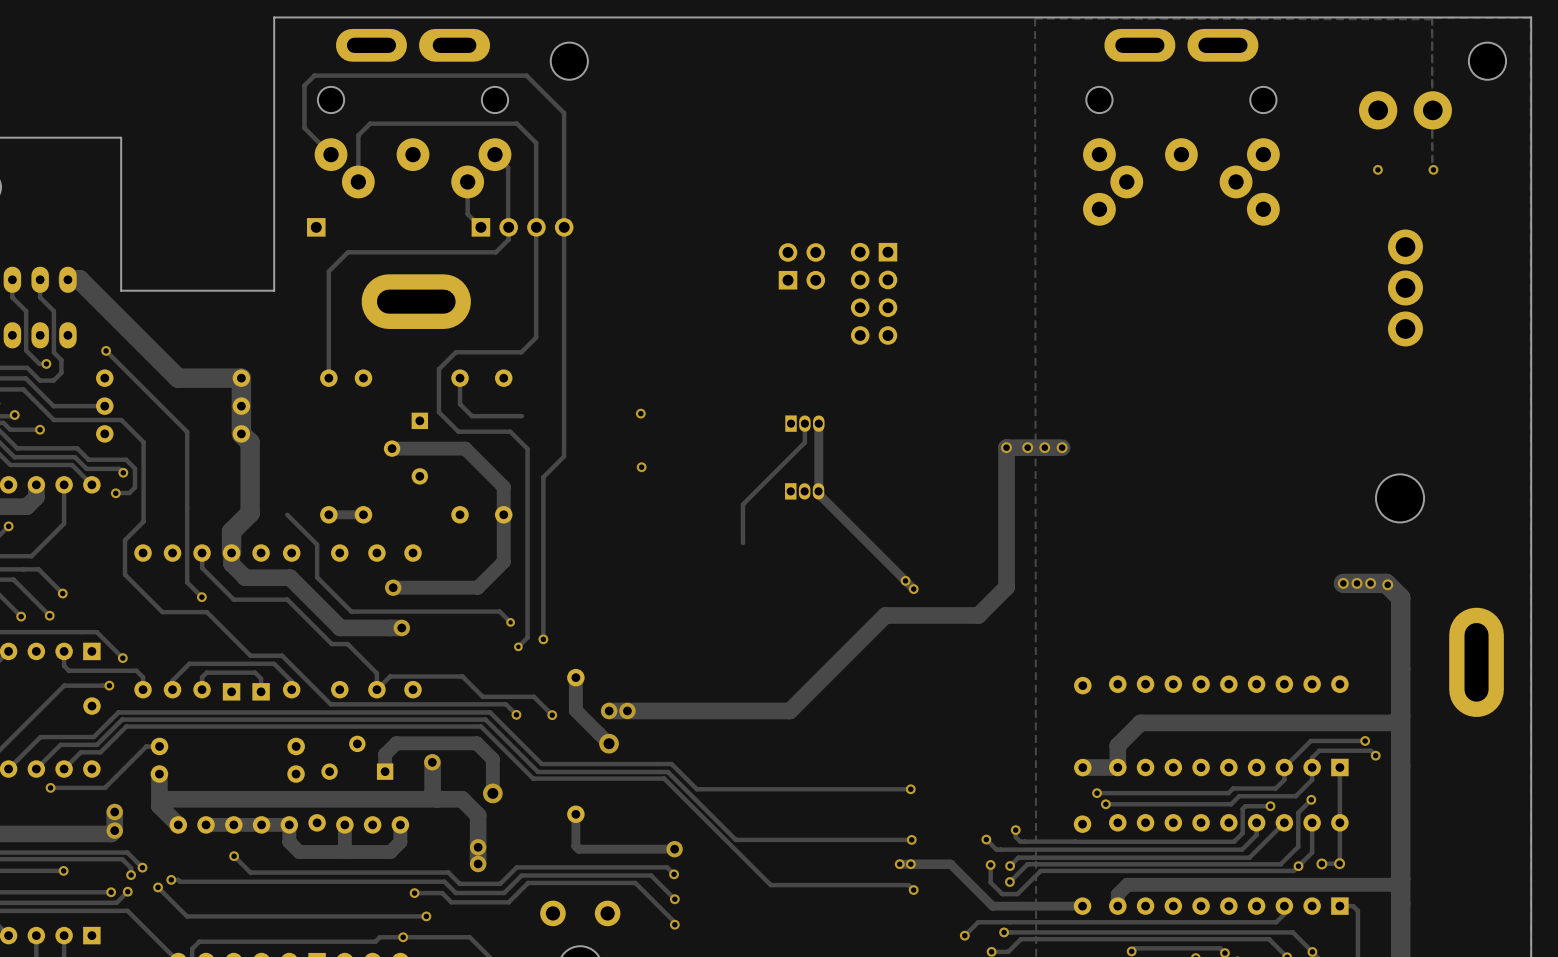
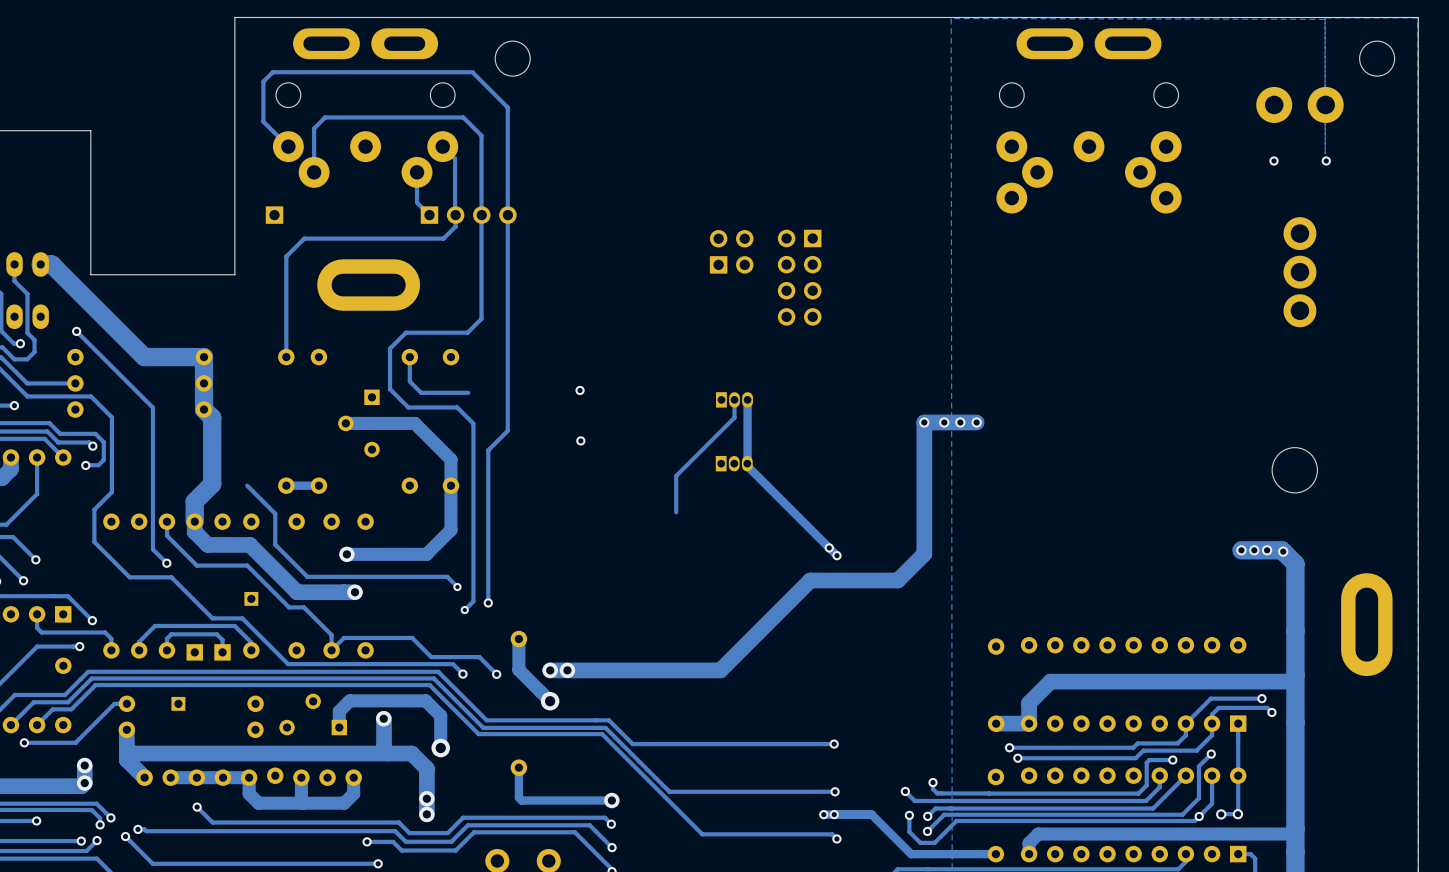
part: none -> (251, 598)
part: none -> (178, 703)

